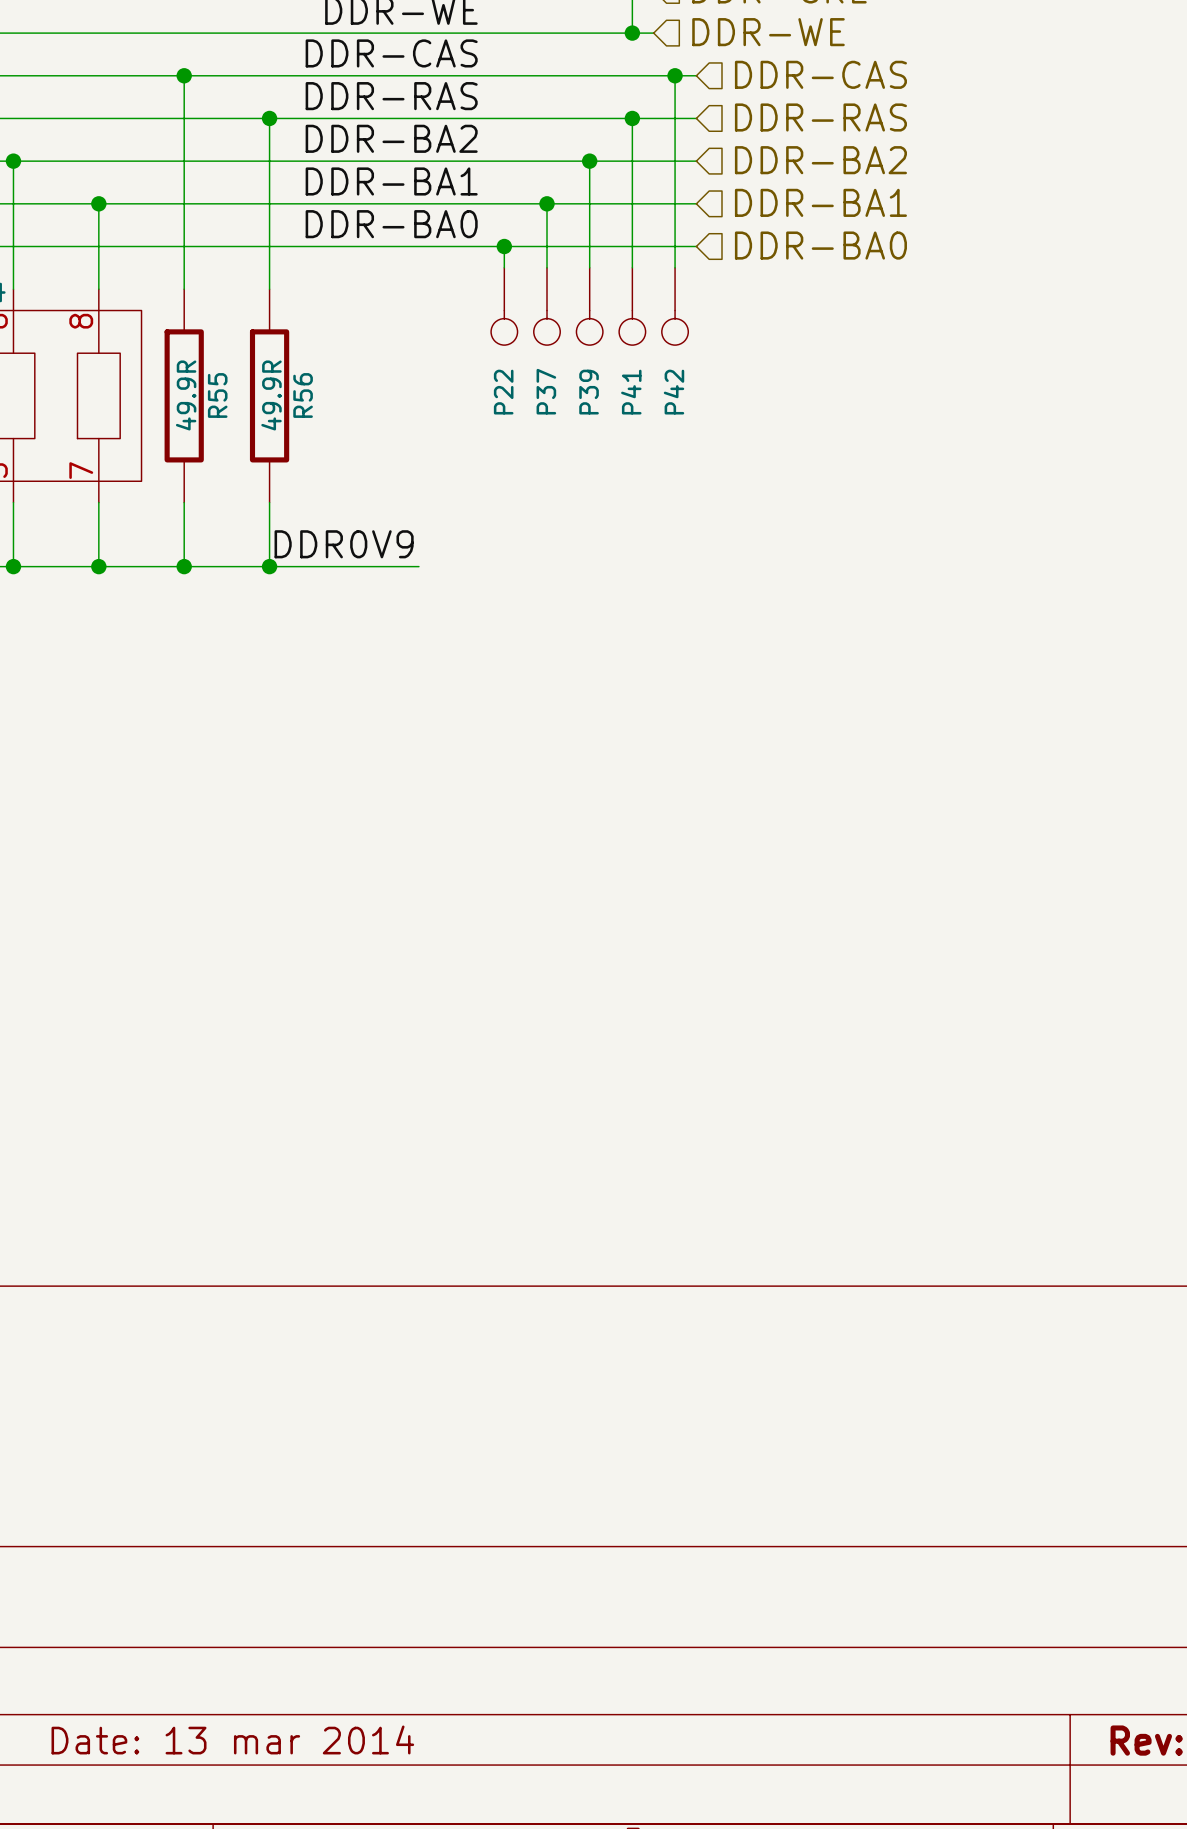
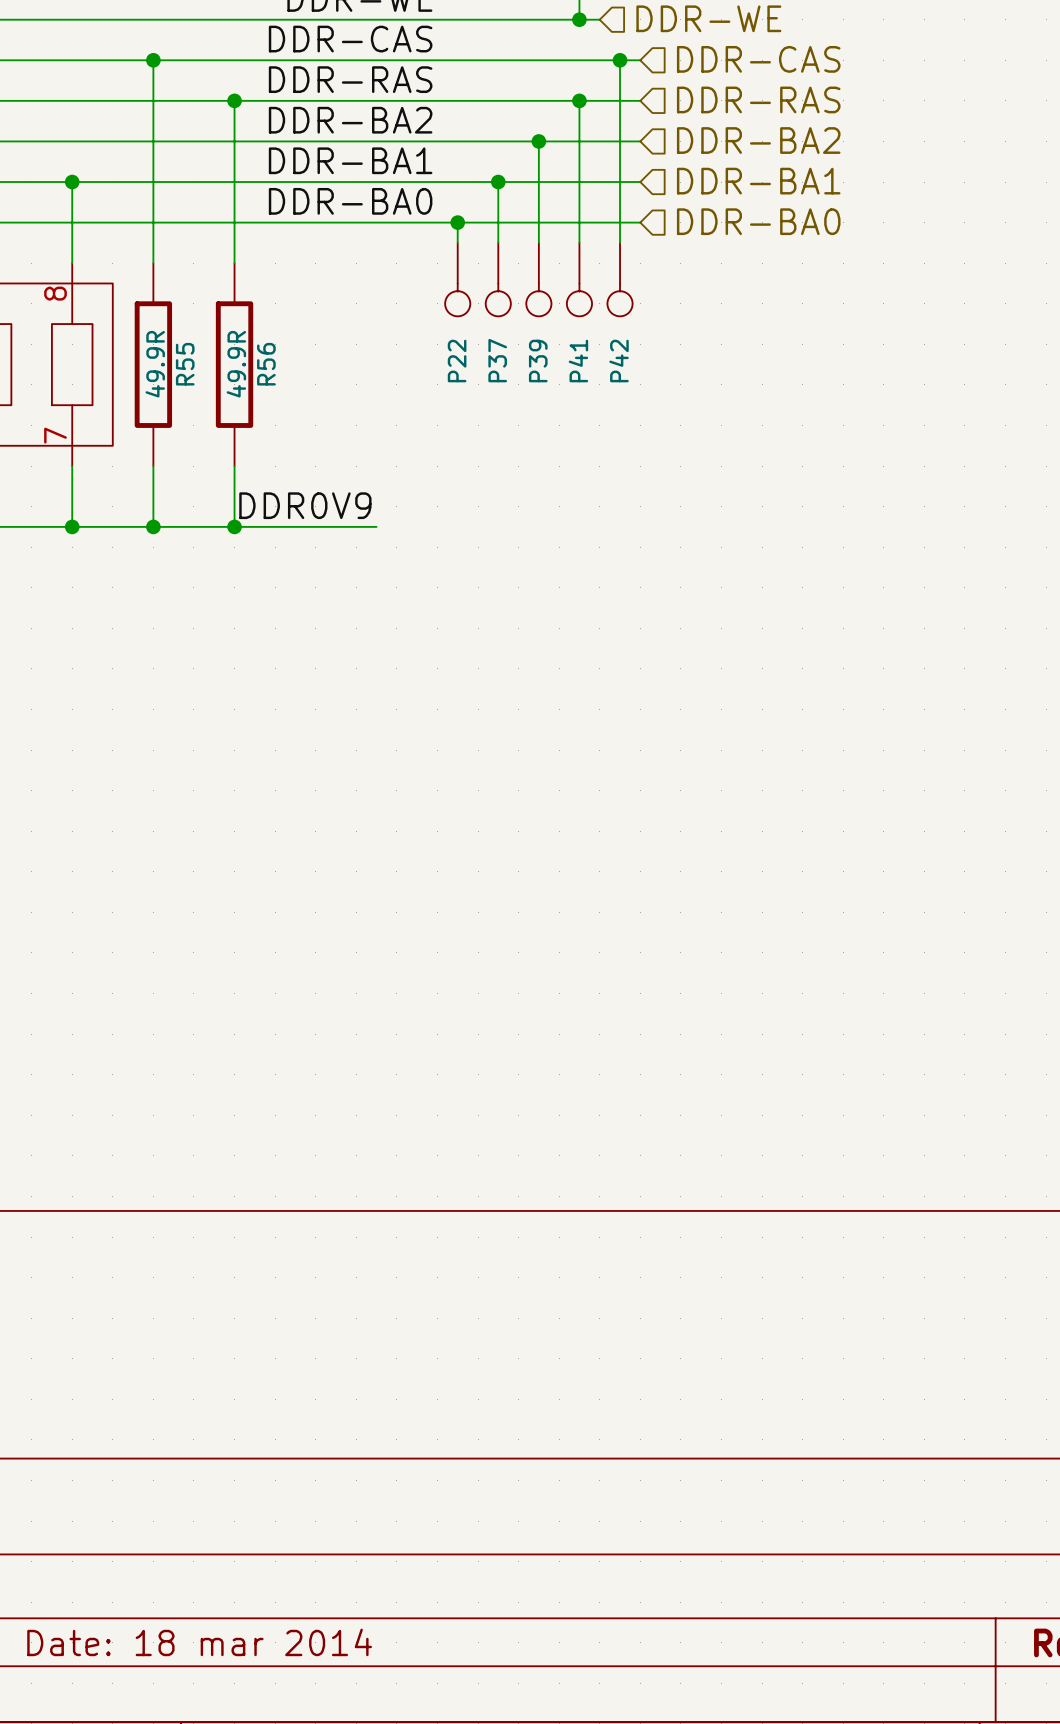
title block: Date: 13 mar 2014 (232, 1739) -> Date: 18 mar 2014 (199, 1642)

